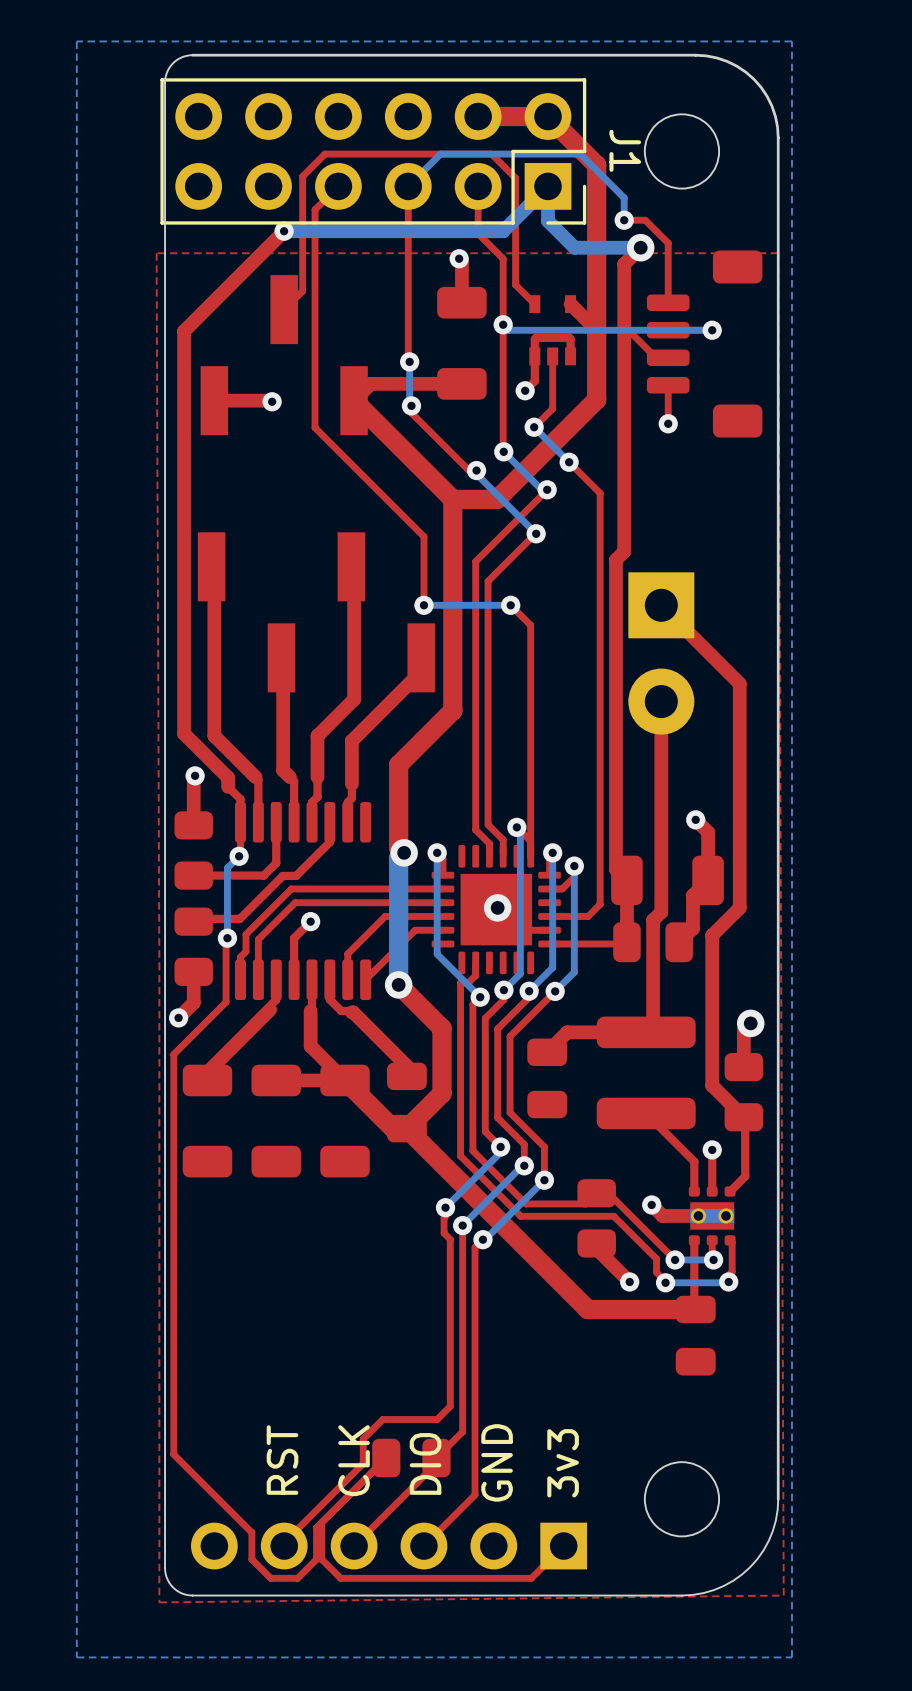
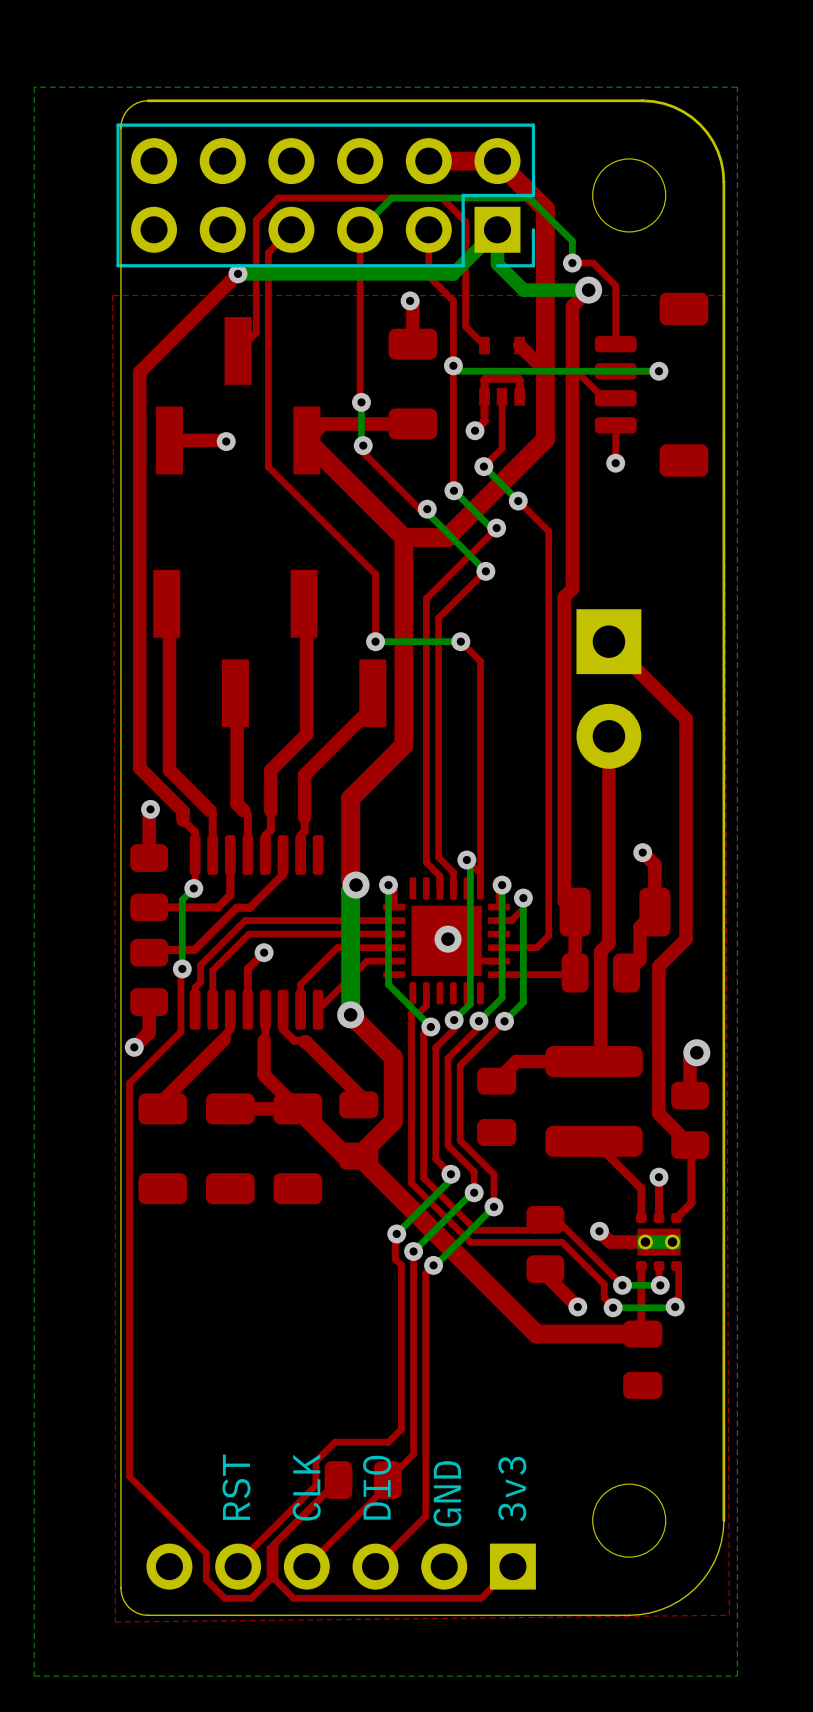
J1 name: J1 (625, 150) -> none

